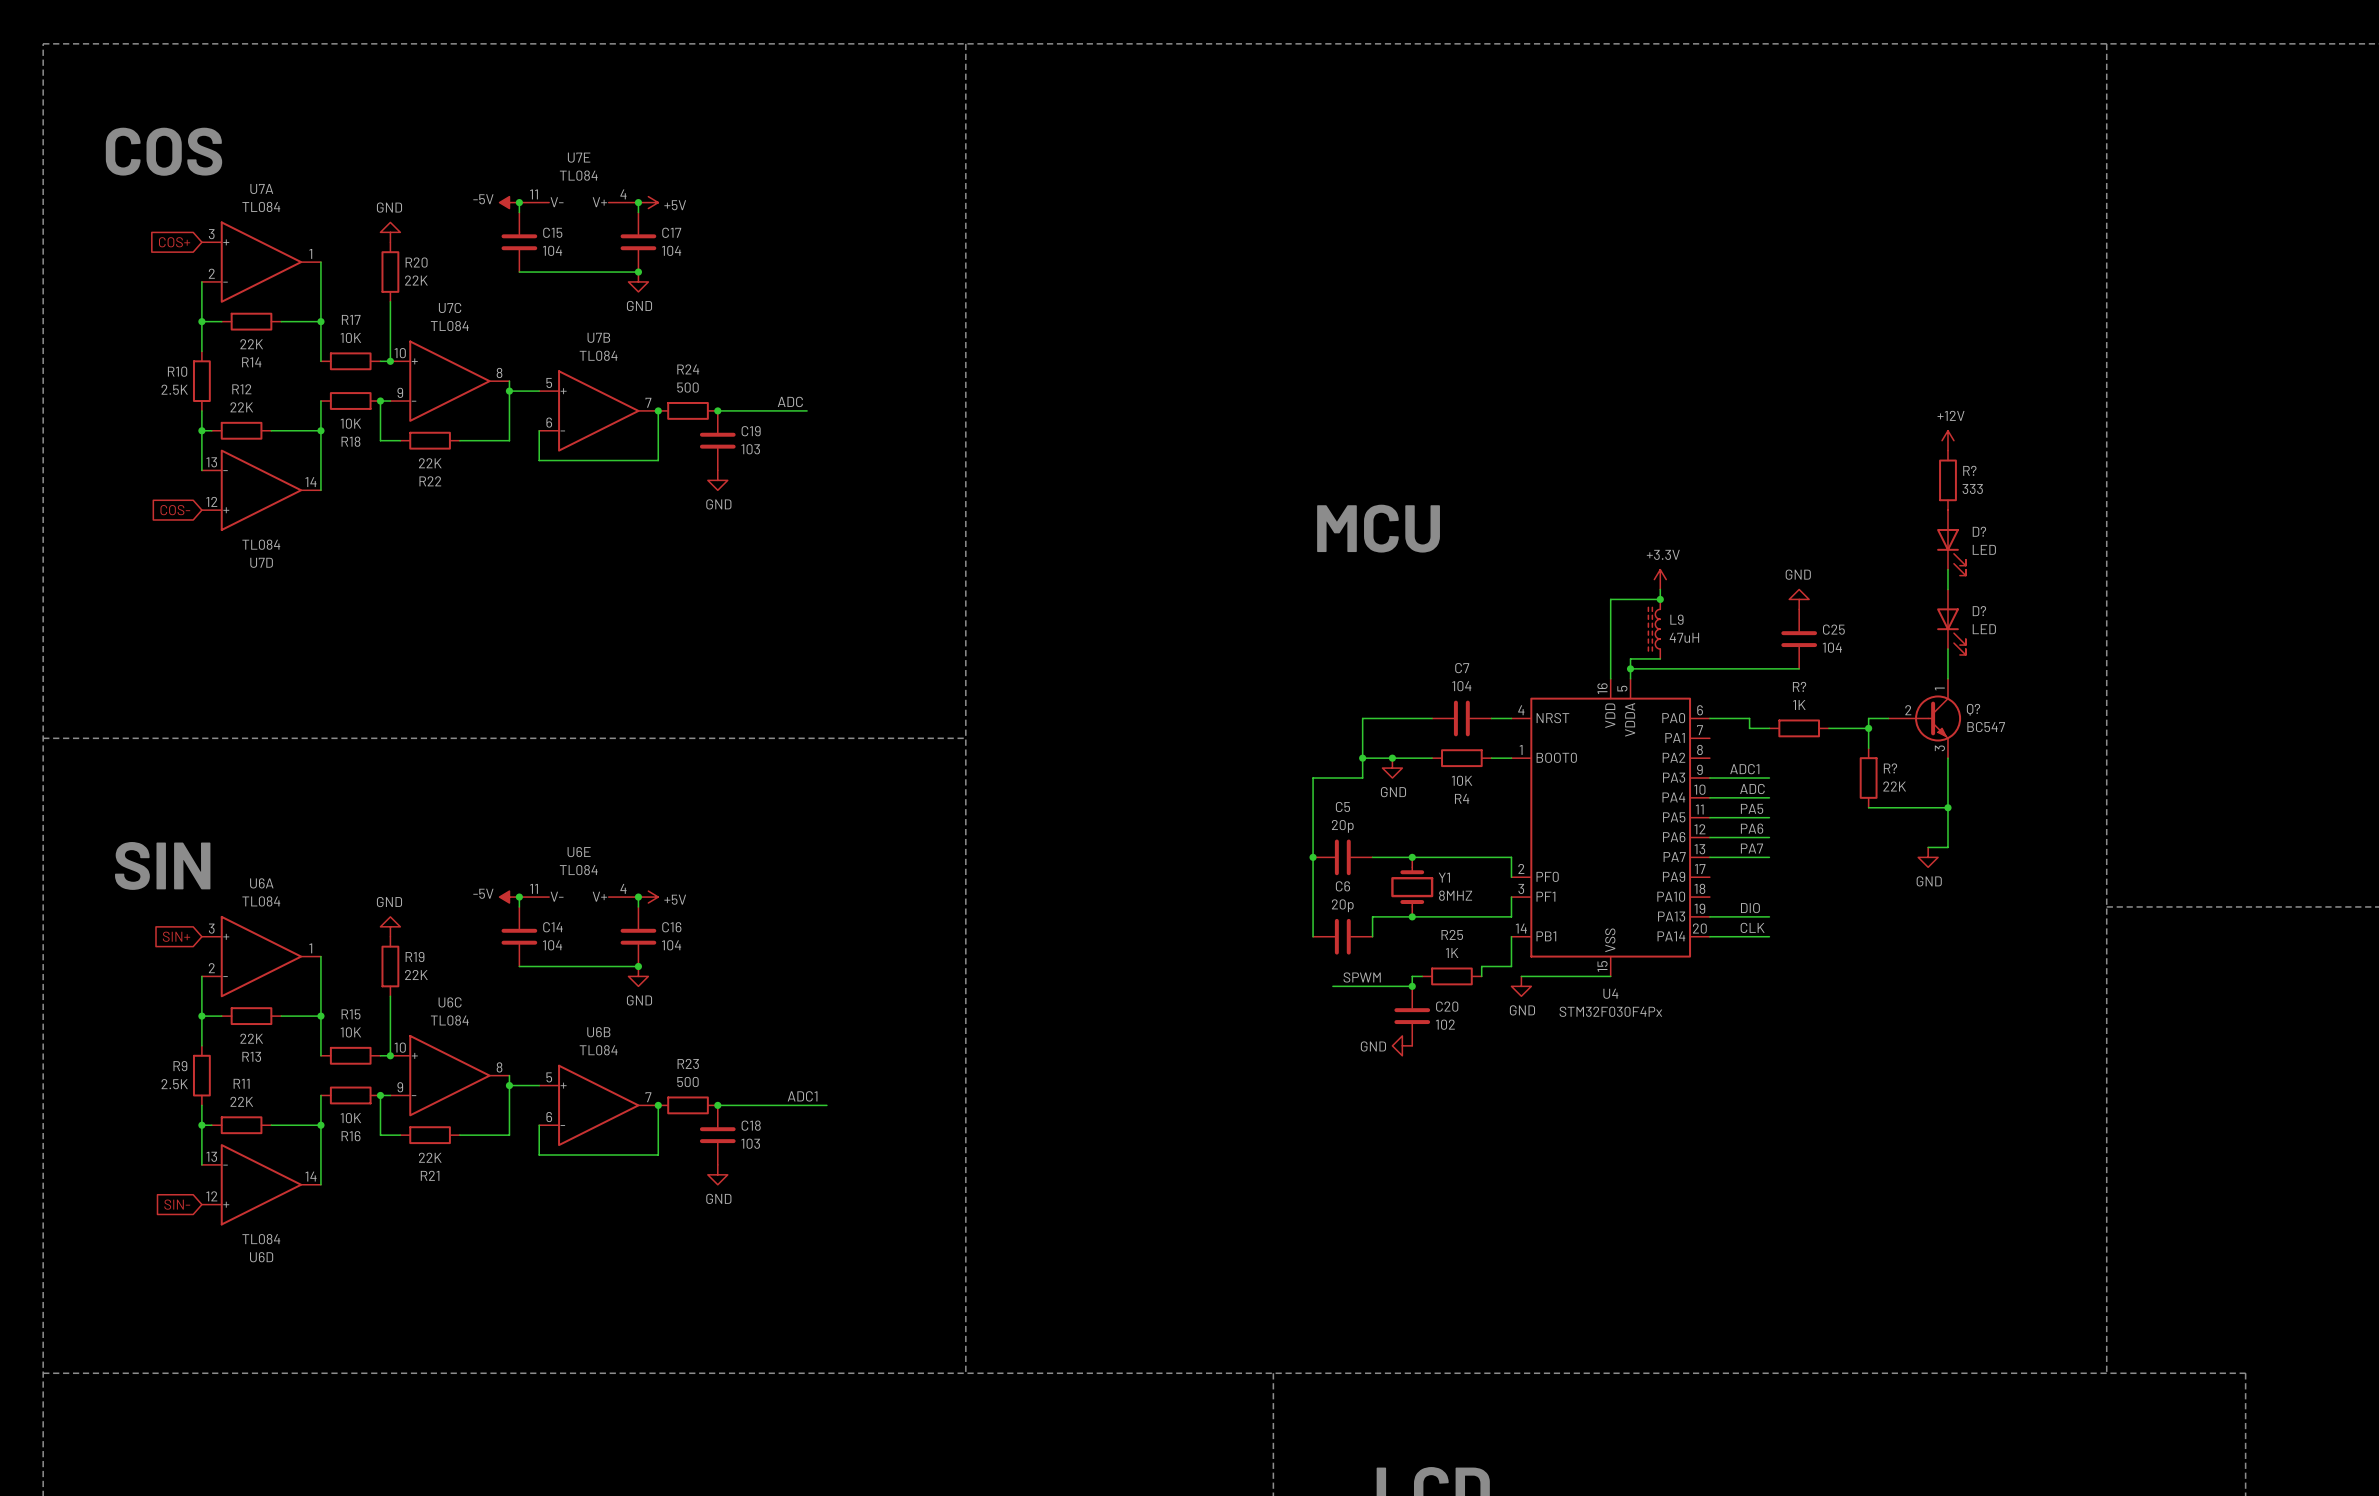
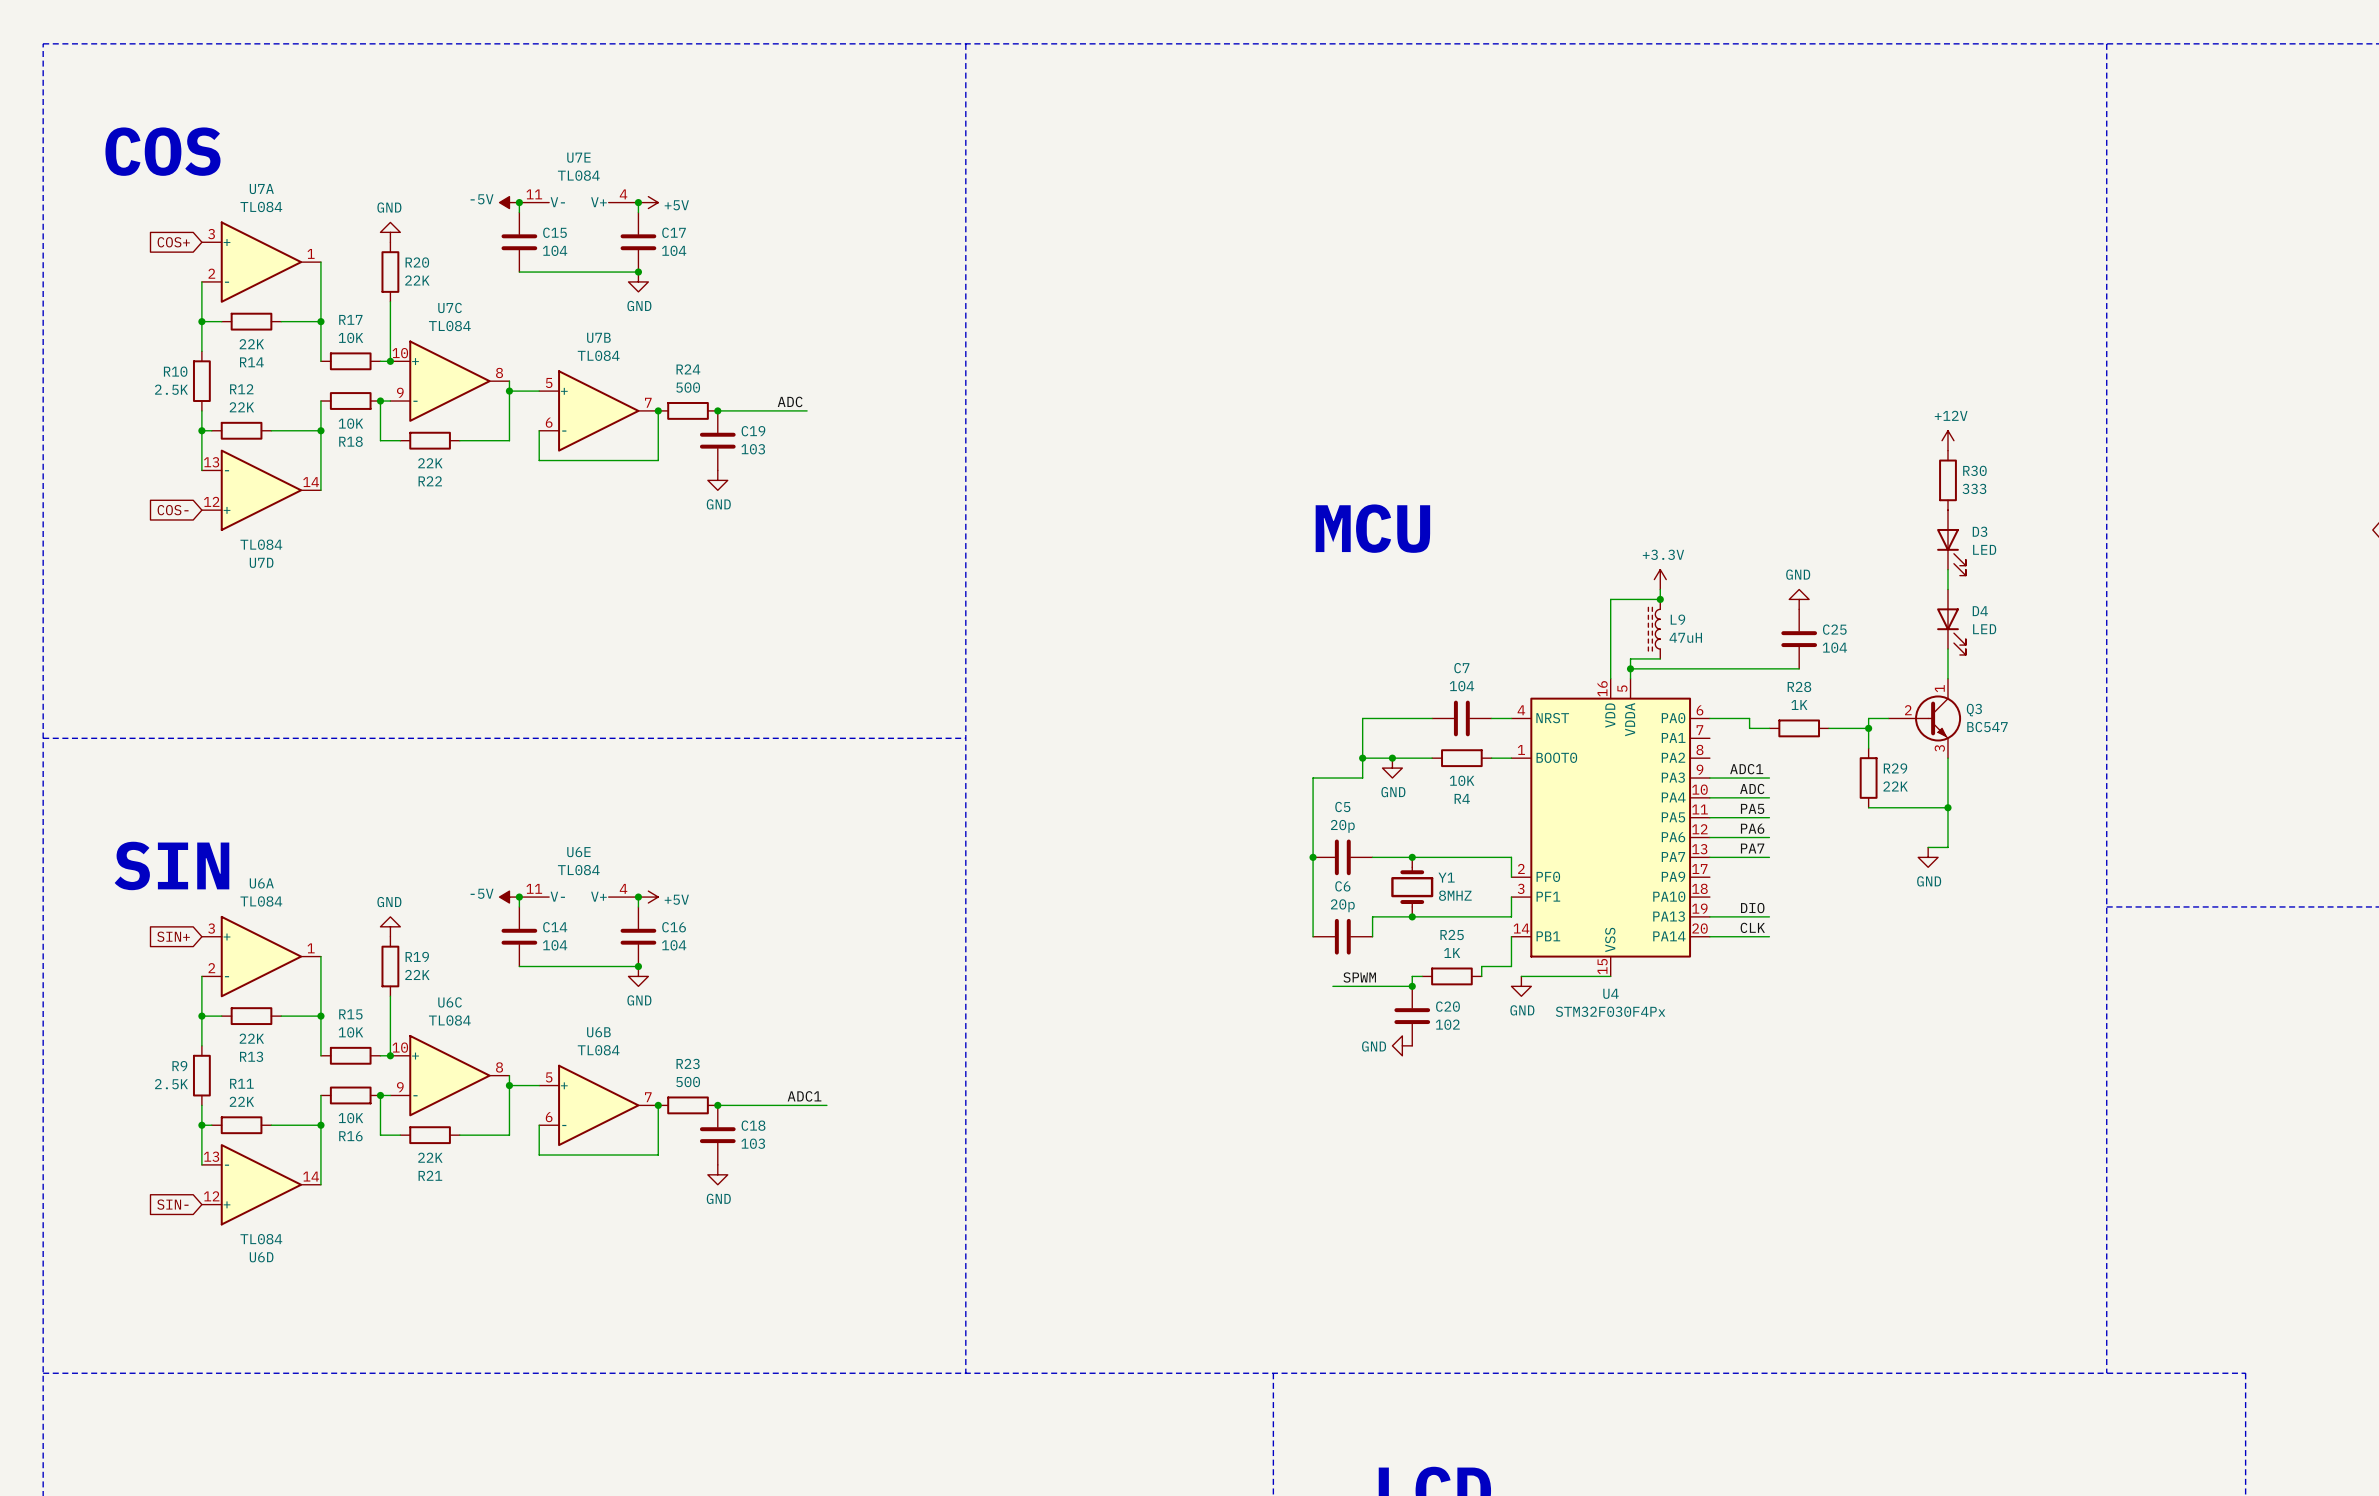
R? name: R? (1969, 470) -> R30 (1974, 470)
D? name: D? (1979, 531) -> D3 (1980, 531)
D? name: D? (1979, 611) -> D4 (1980, 611)
R? name: R? (1799, 686) -> R28 (1799, 686)
Q? name: Q? (1973, 709) -> Q3 (1974, 710)
R? name: R? (1890, 768) -> R29 (1895, 768)

